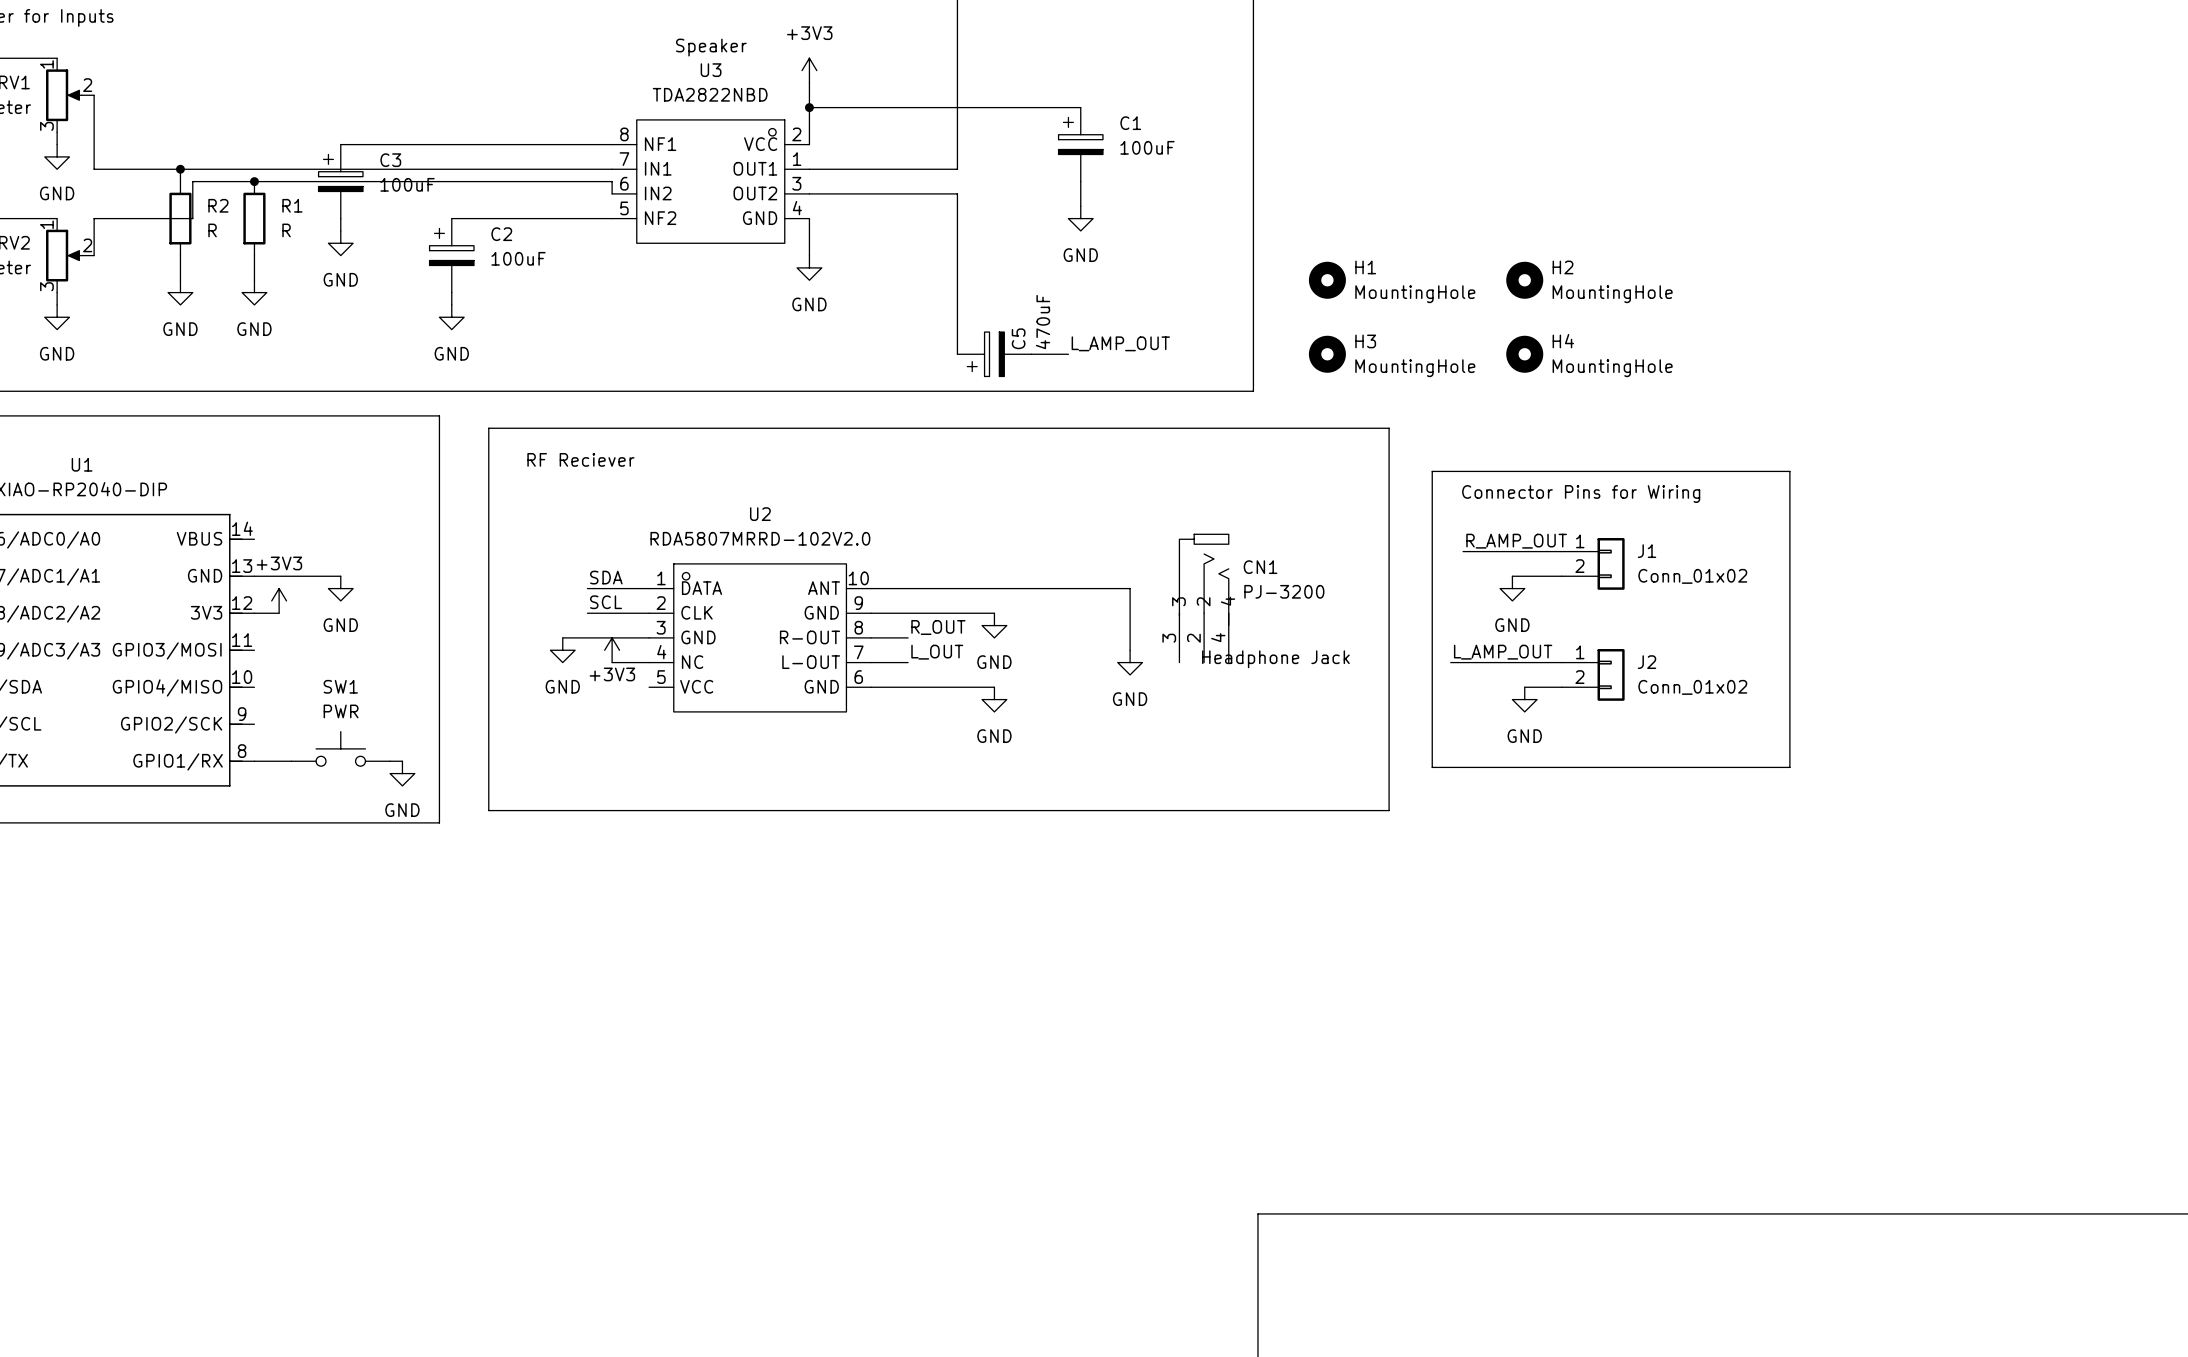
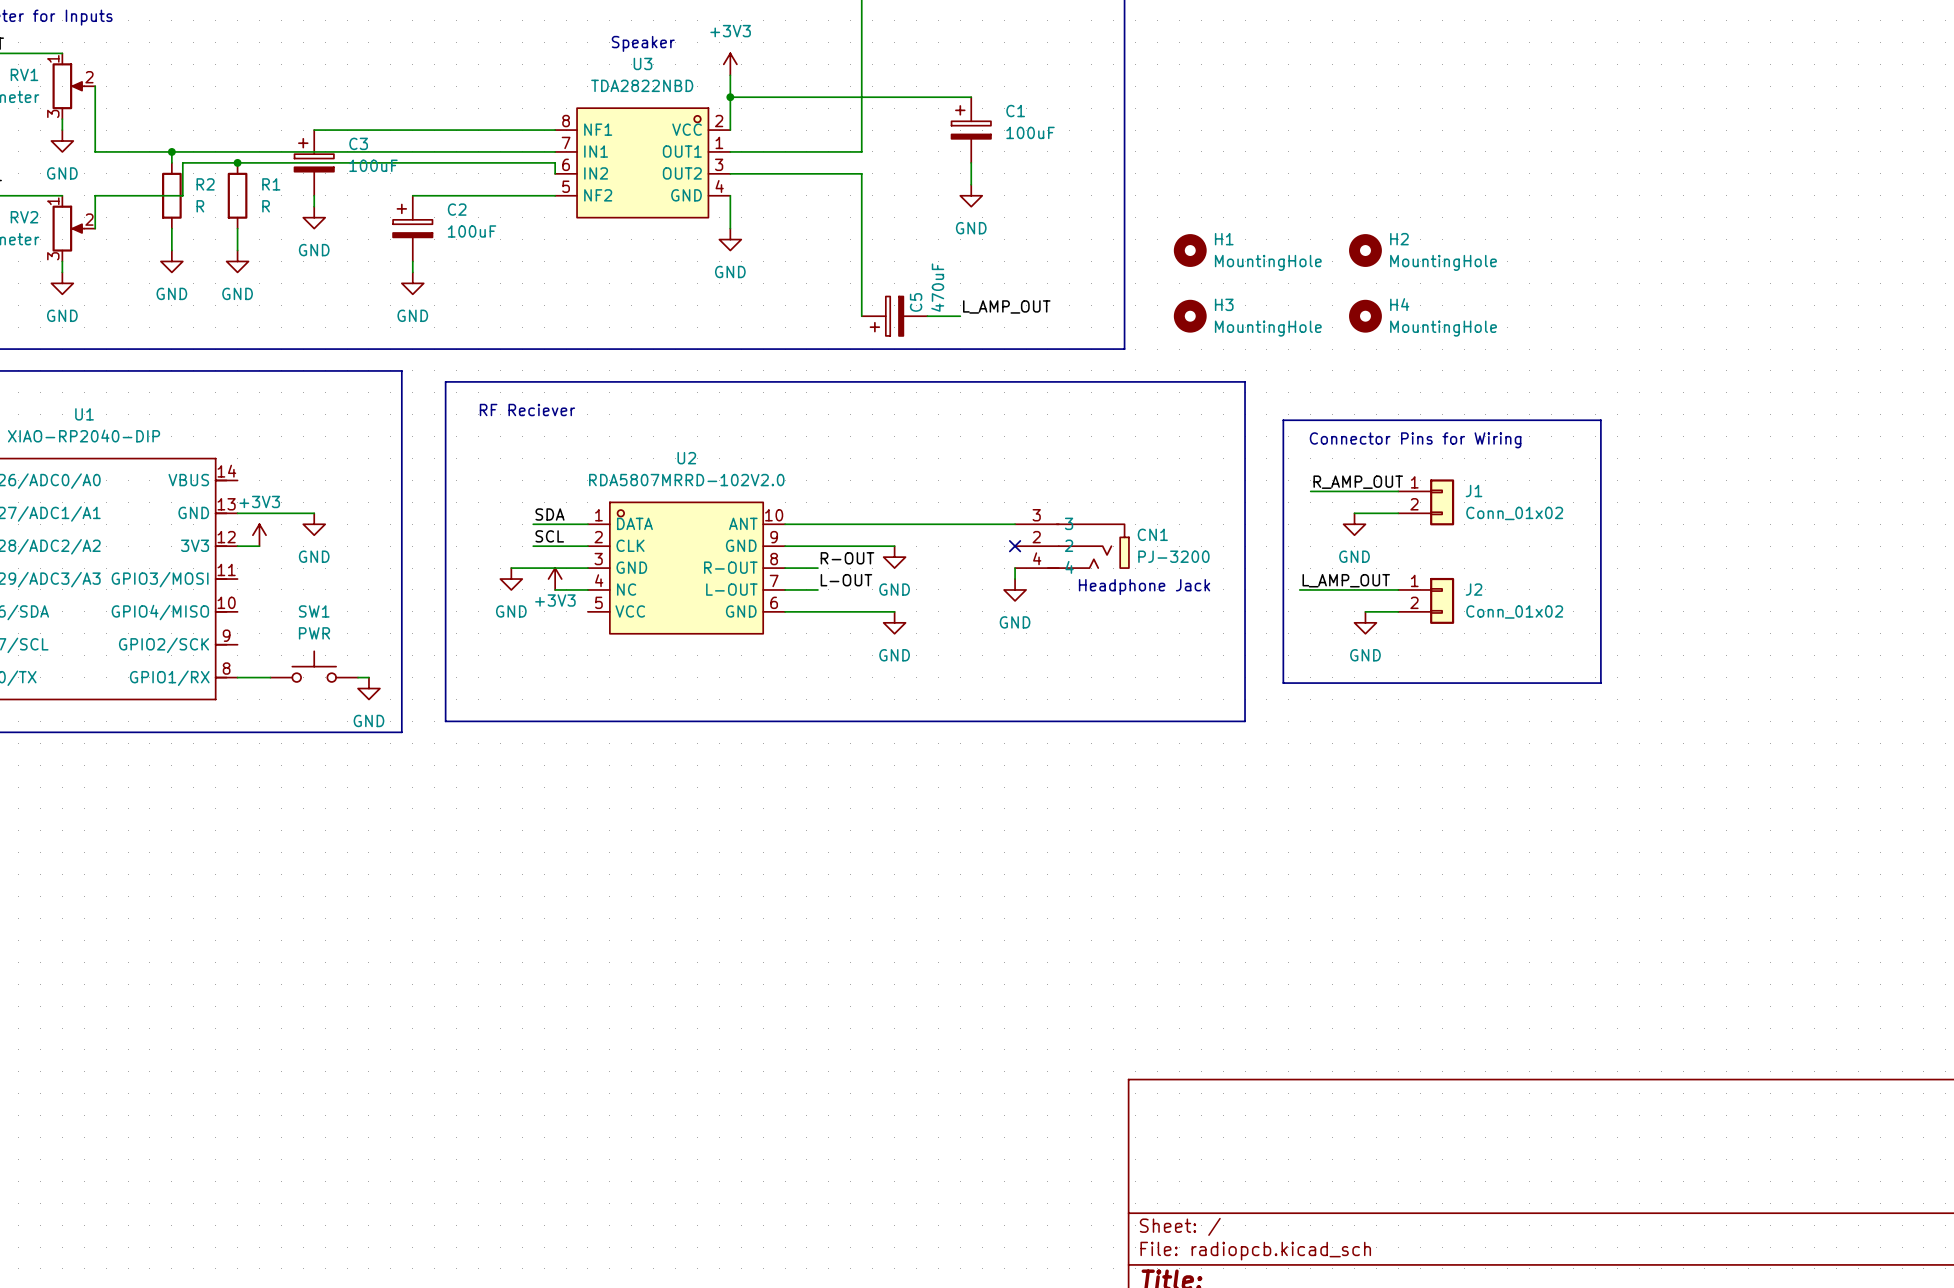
CN1 name position: CN1 (1260, 567) -> CN1 (1152, 534)
CN1 rotation: 0° (1204, 579) -> 90° clockwise (1088, 546)
wire: (1130, 588) (1130, 637) -> none
CN1 value position: PJ-3200 (1284, 591) -> PJ-3200 (1173, 556)
no-connect mark: none -> (1015, 546)
label: R_OUT (938, 627) -> R-OUT (847, 558)
label: L_OUT (937, 652) -> L-OUT (846, 580)

